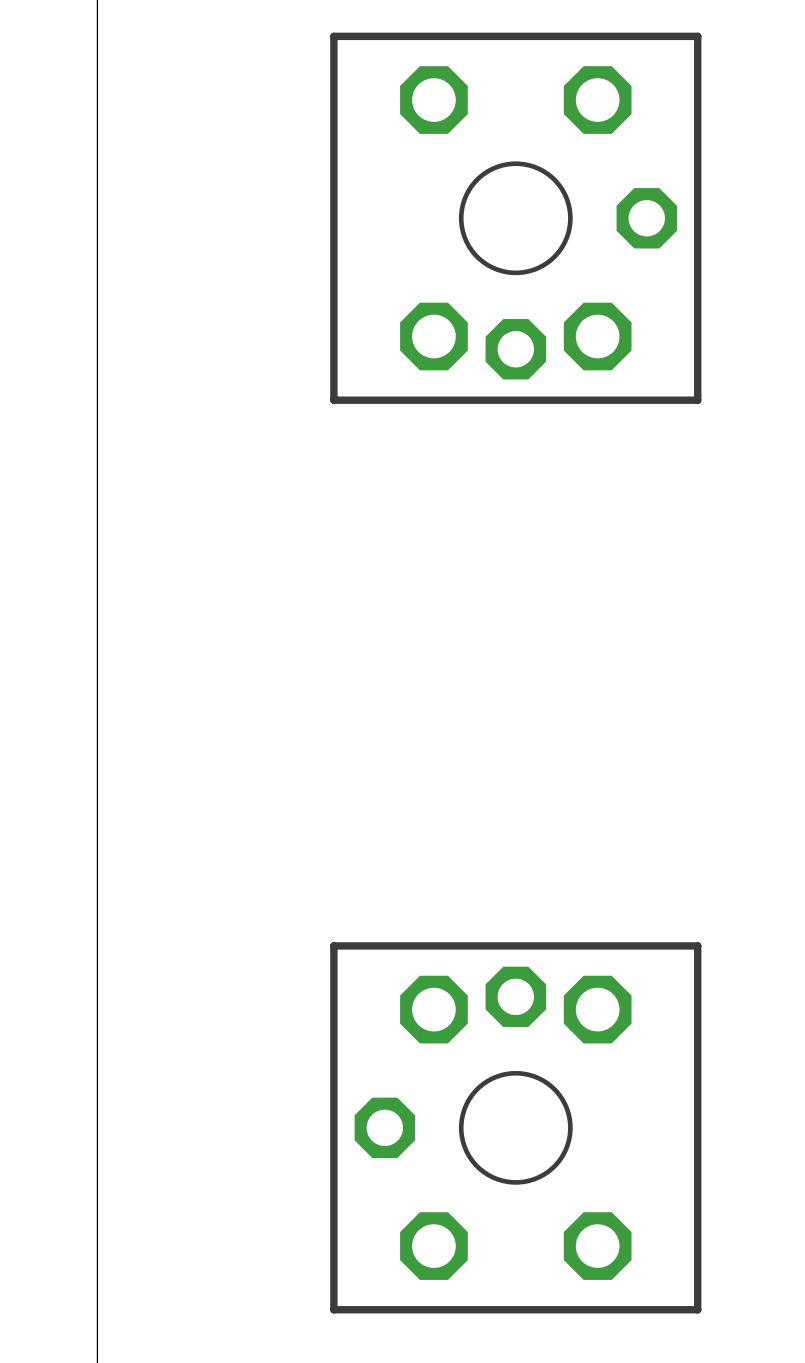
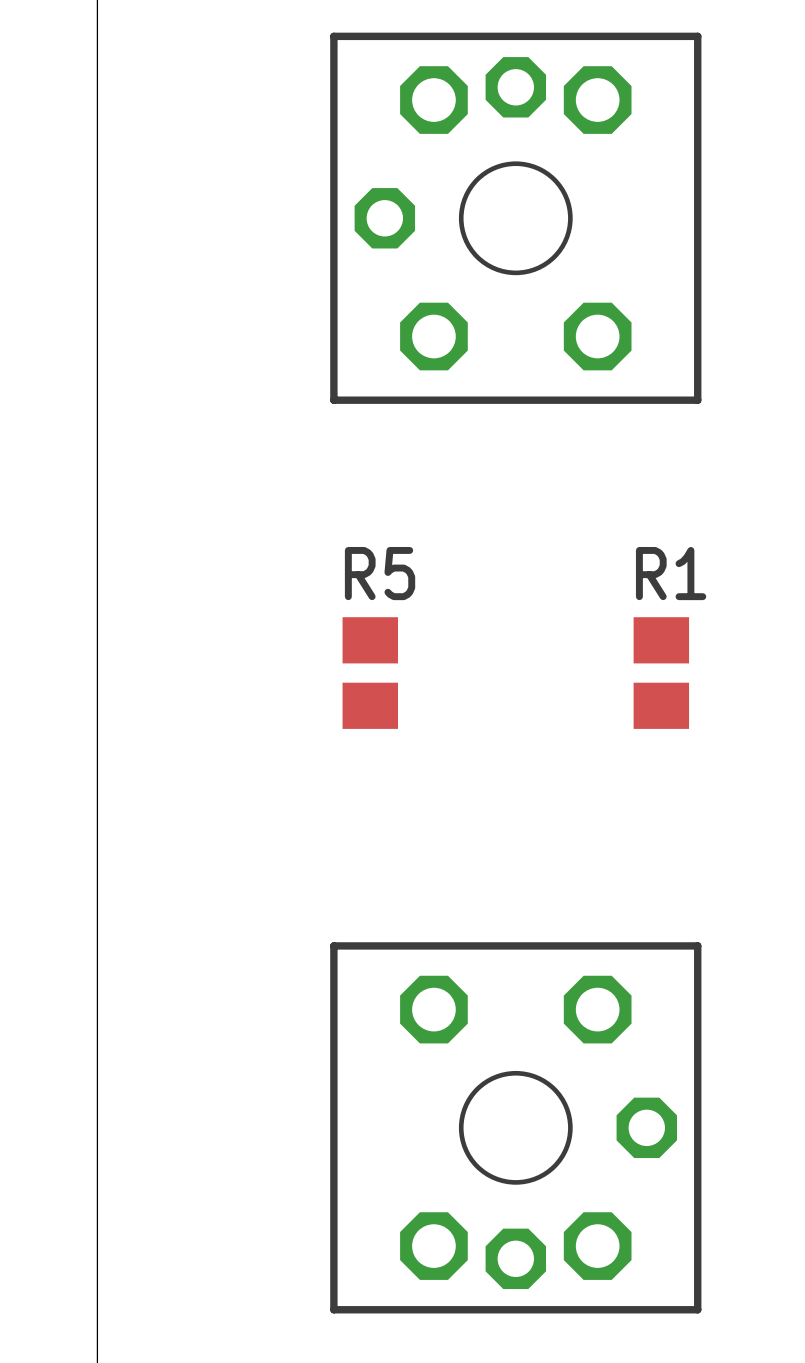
part rotation: 0° (515, 218) -> 180° (515, 218)
R5: none -> (370, 673)
R1: none -> (661, 673)
part rotation: 0° (515, 1127) -> 180° (515, 1127)

